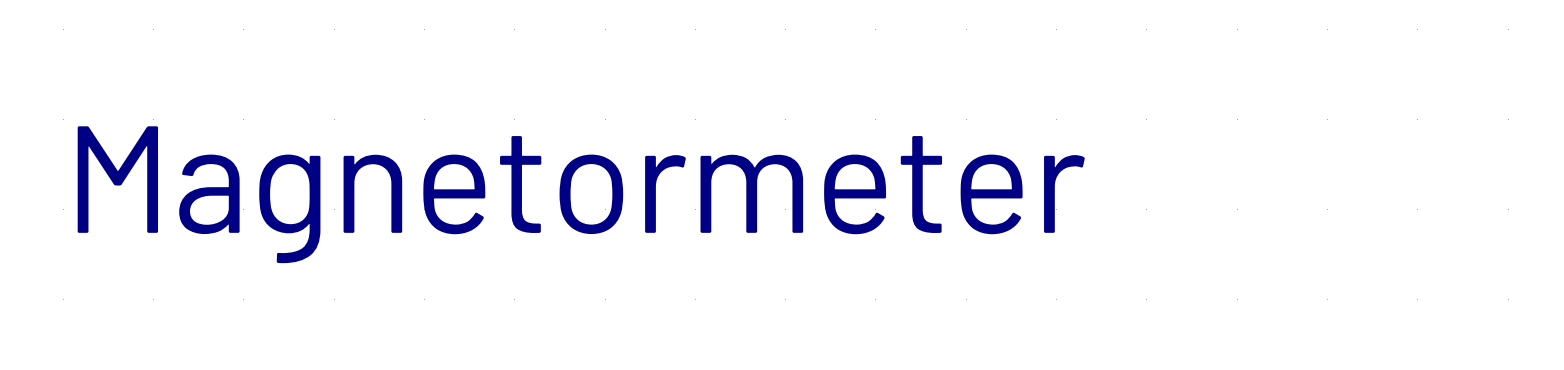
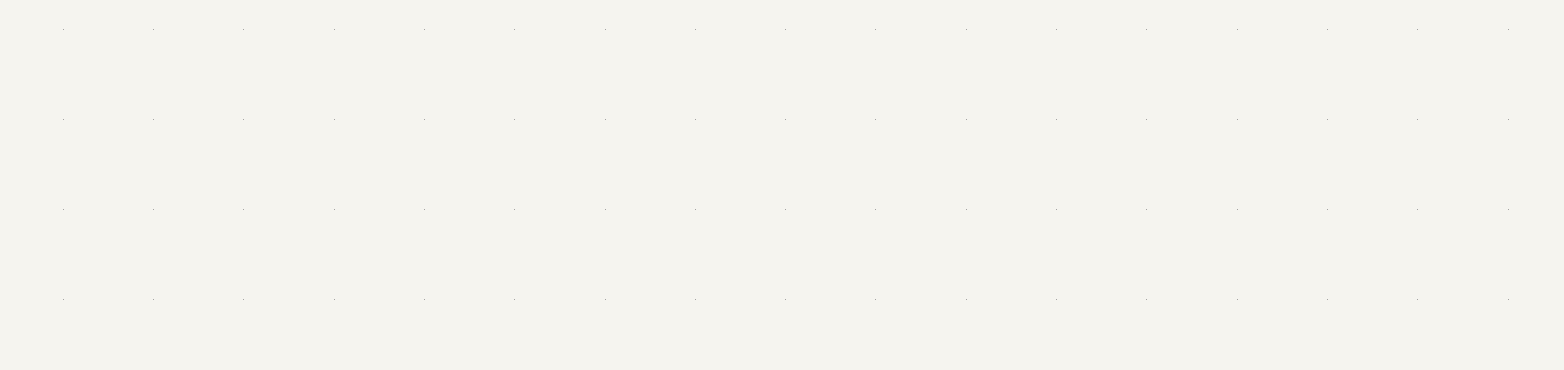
text: Magnetormeter (581, 194) -> none

